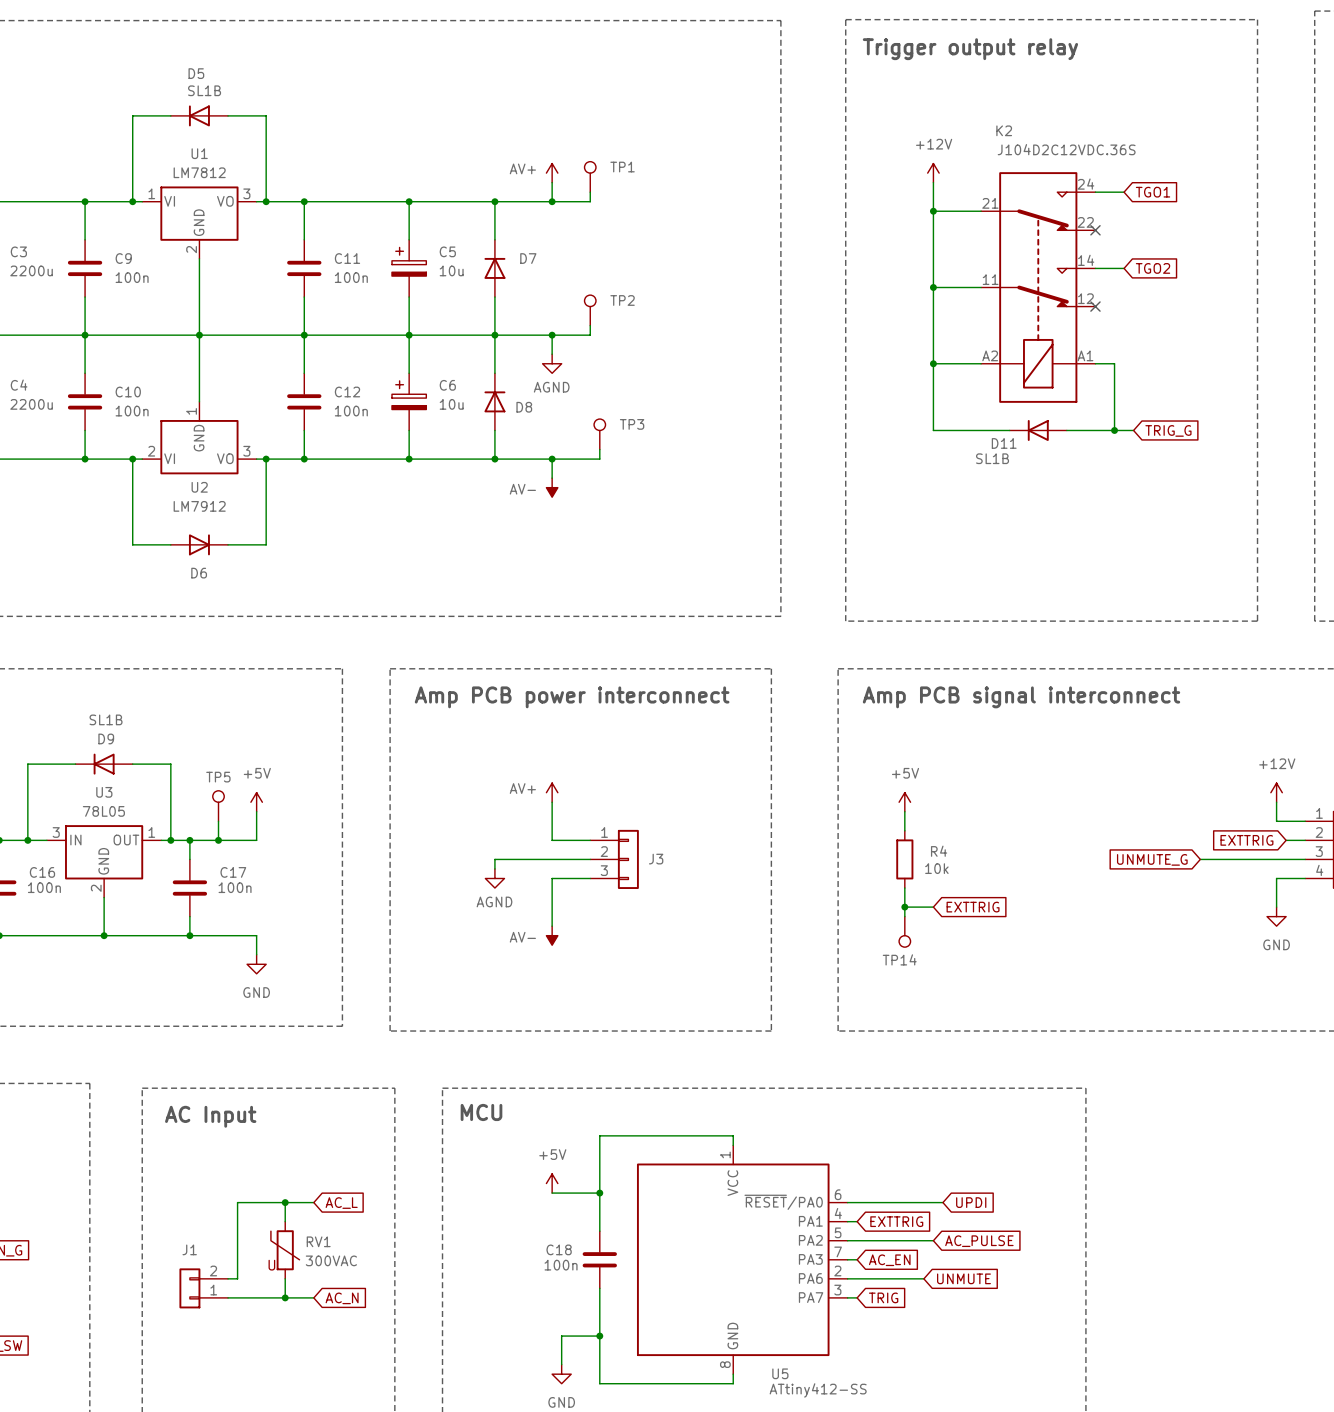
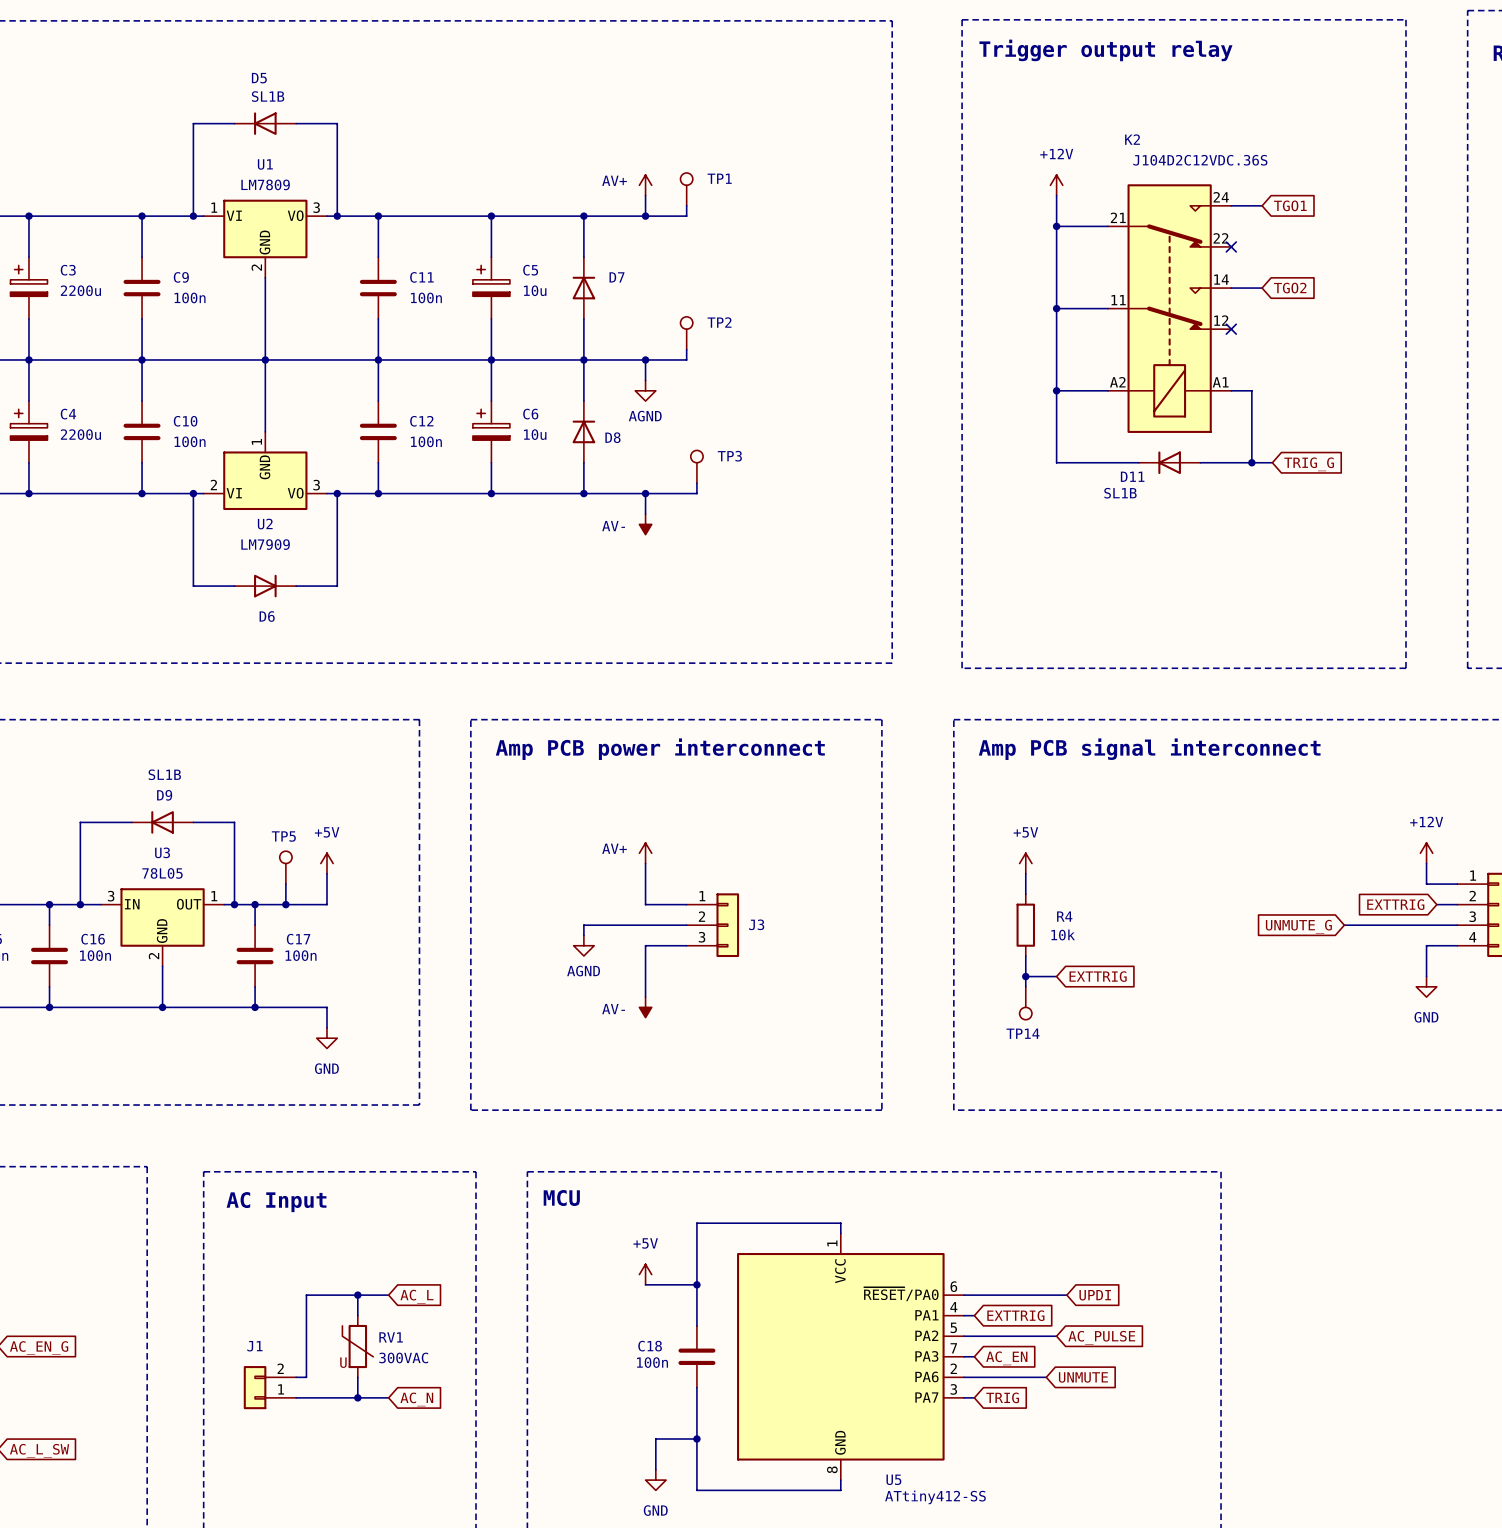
U1 value: LM7812 (199, 172) -> LM7809 (265, 184)
U2 value: LM7912 (199, 506) -> LM7909 (265, 544)

